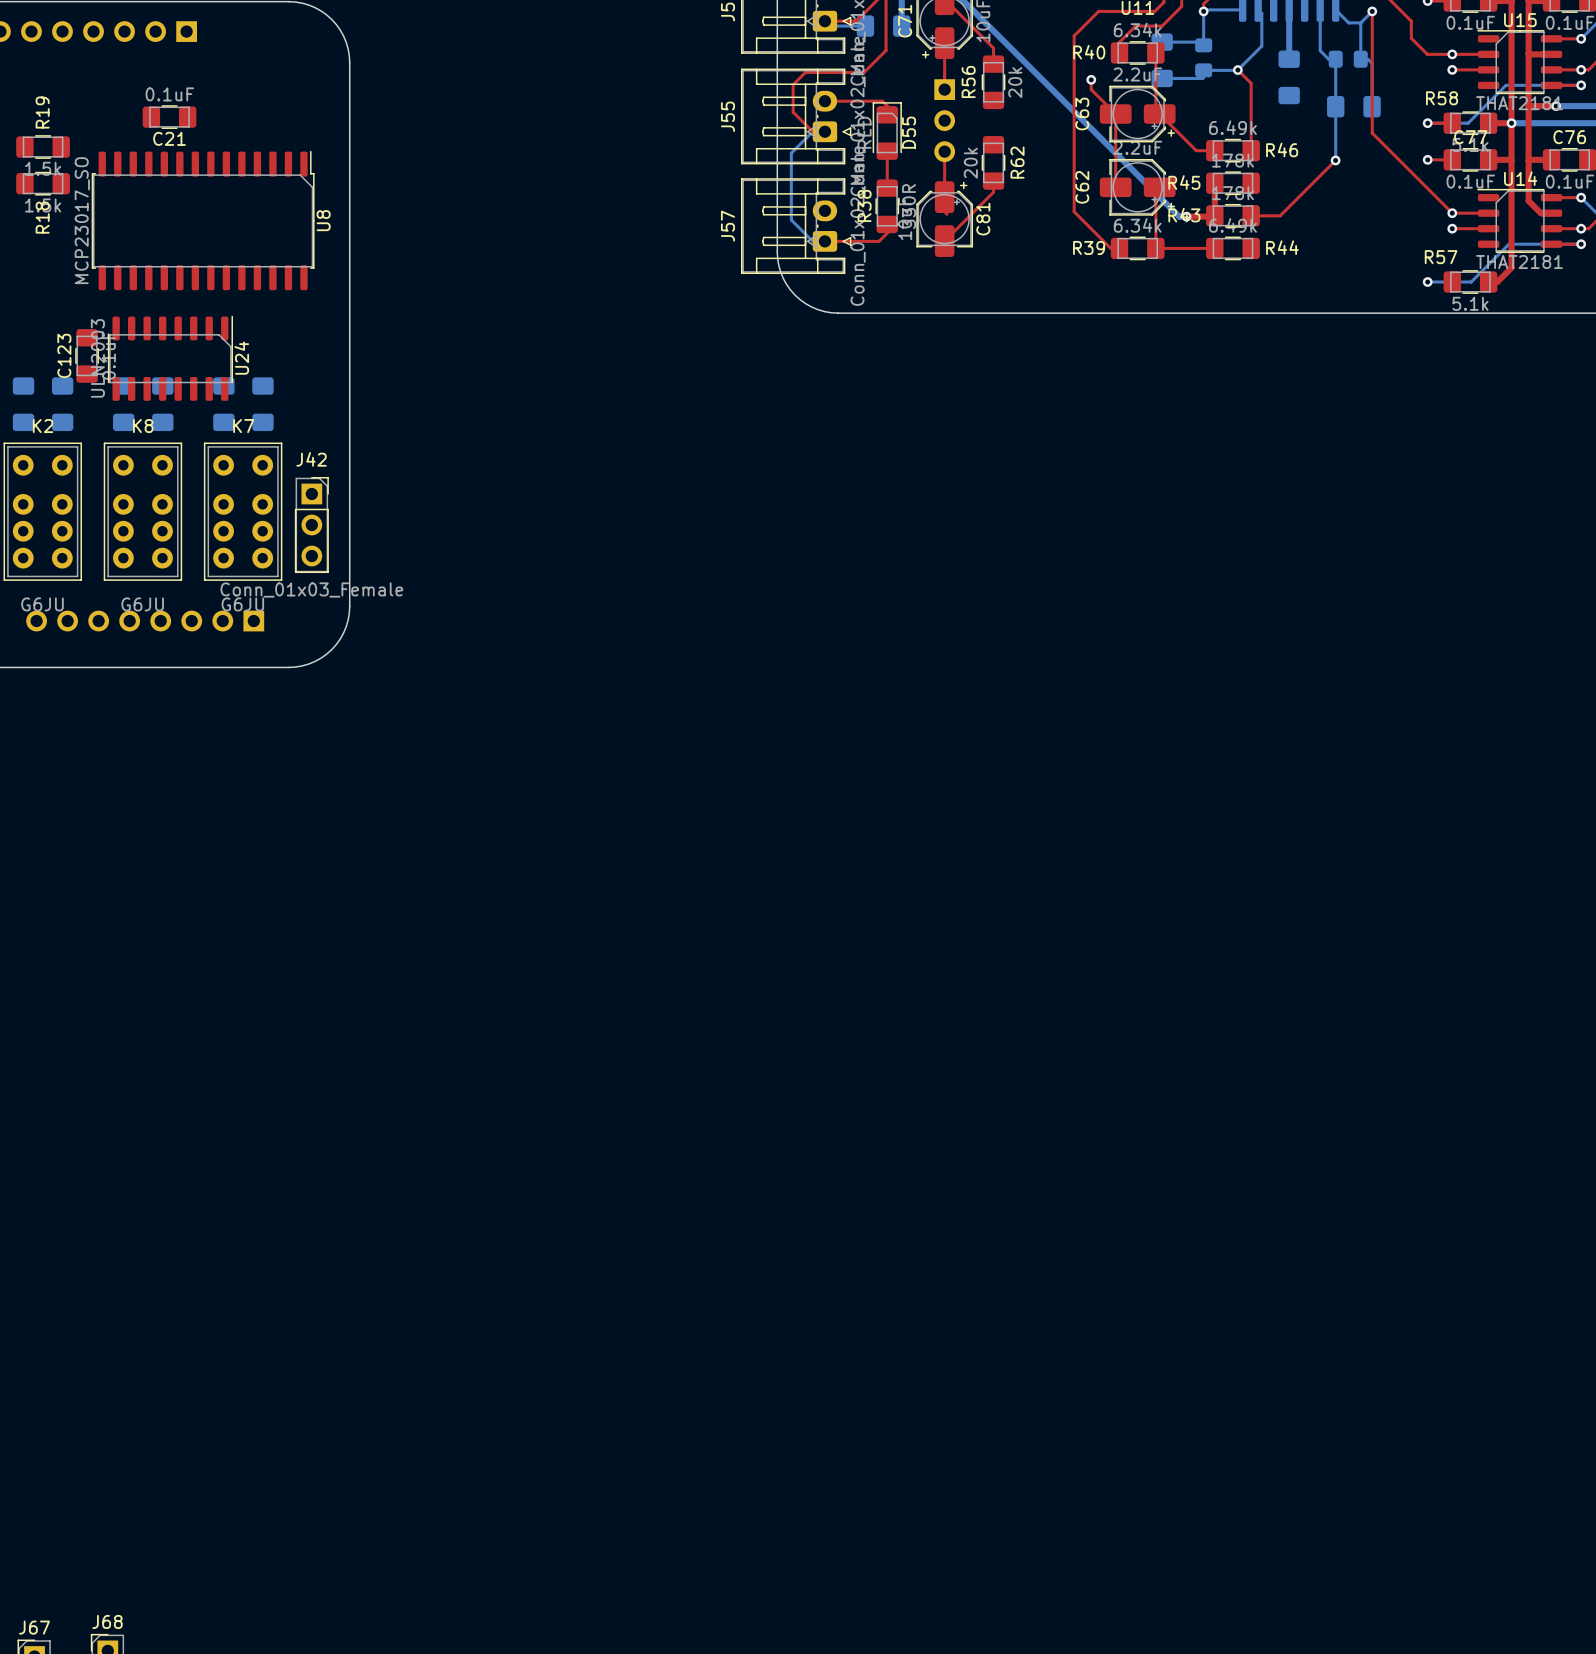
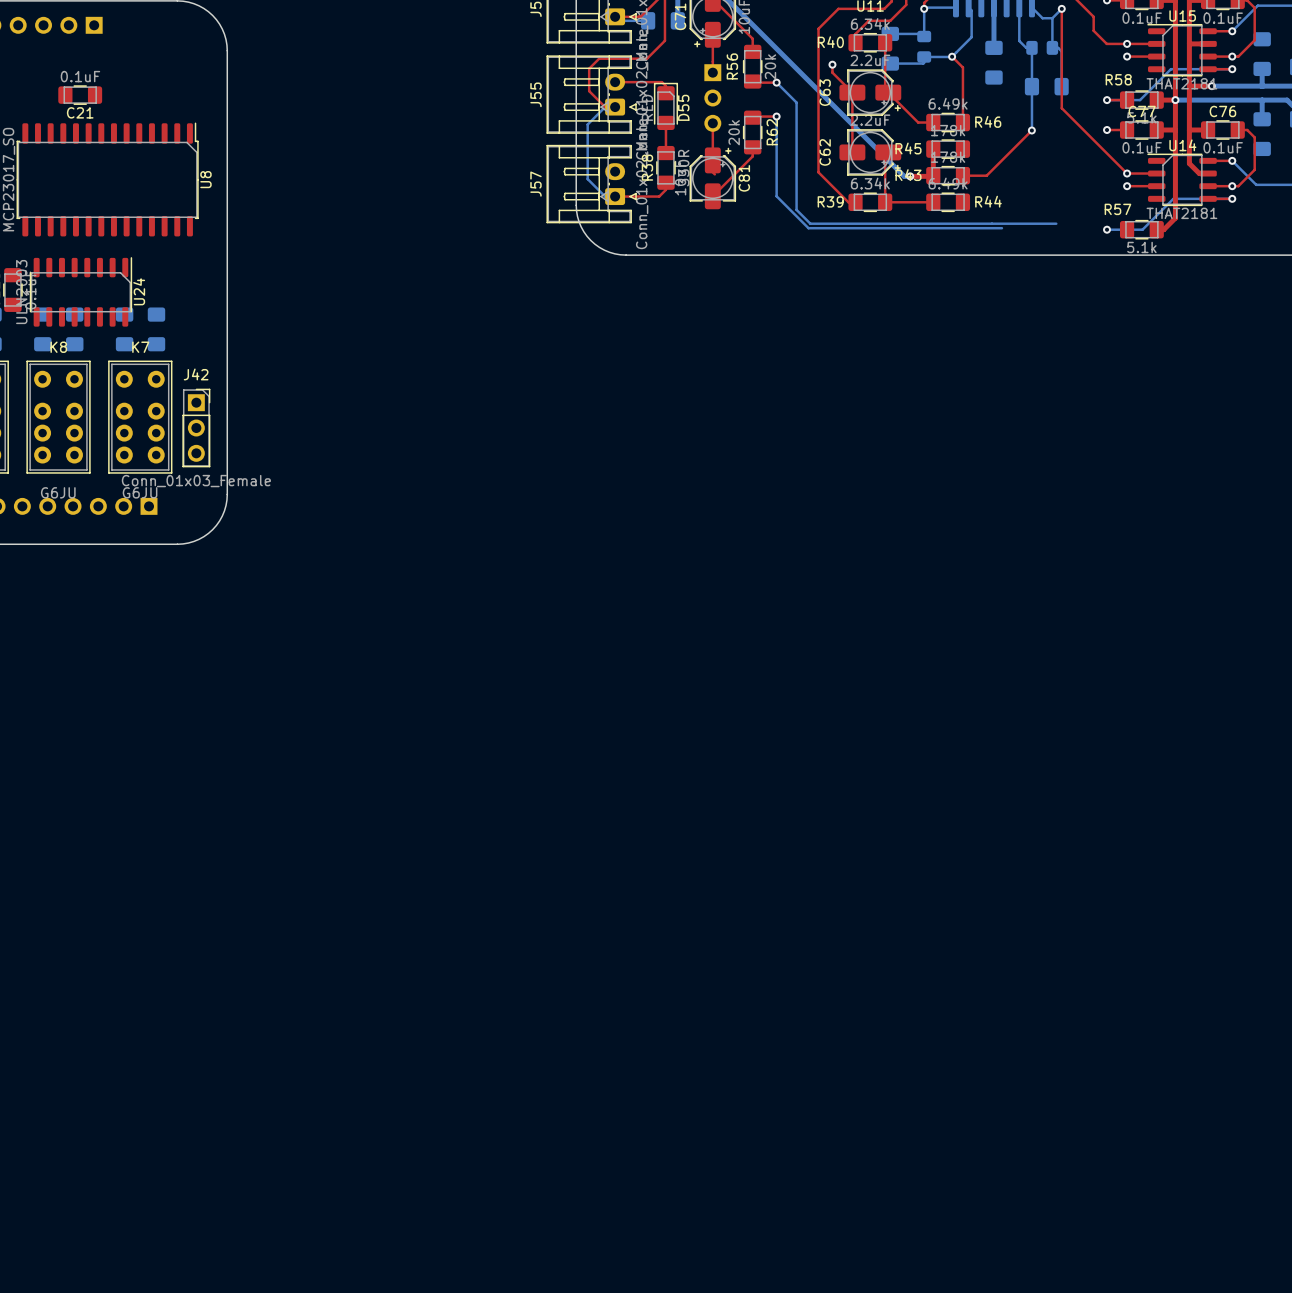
top track: none -> (752, 81) (776, 82)
bottom track: none -> (776, 82) (796, 102) (796, 209) (810, 223) (1056, 223)
via: none -> (776, 82)
top track: none -> (776, 116) (752, 117)
bottom track: none -> (776, 116) (776, 196) (808, 228) (1001, 228)
via: none -> (776, 116)

